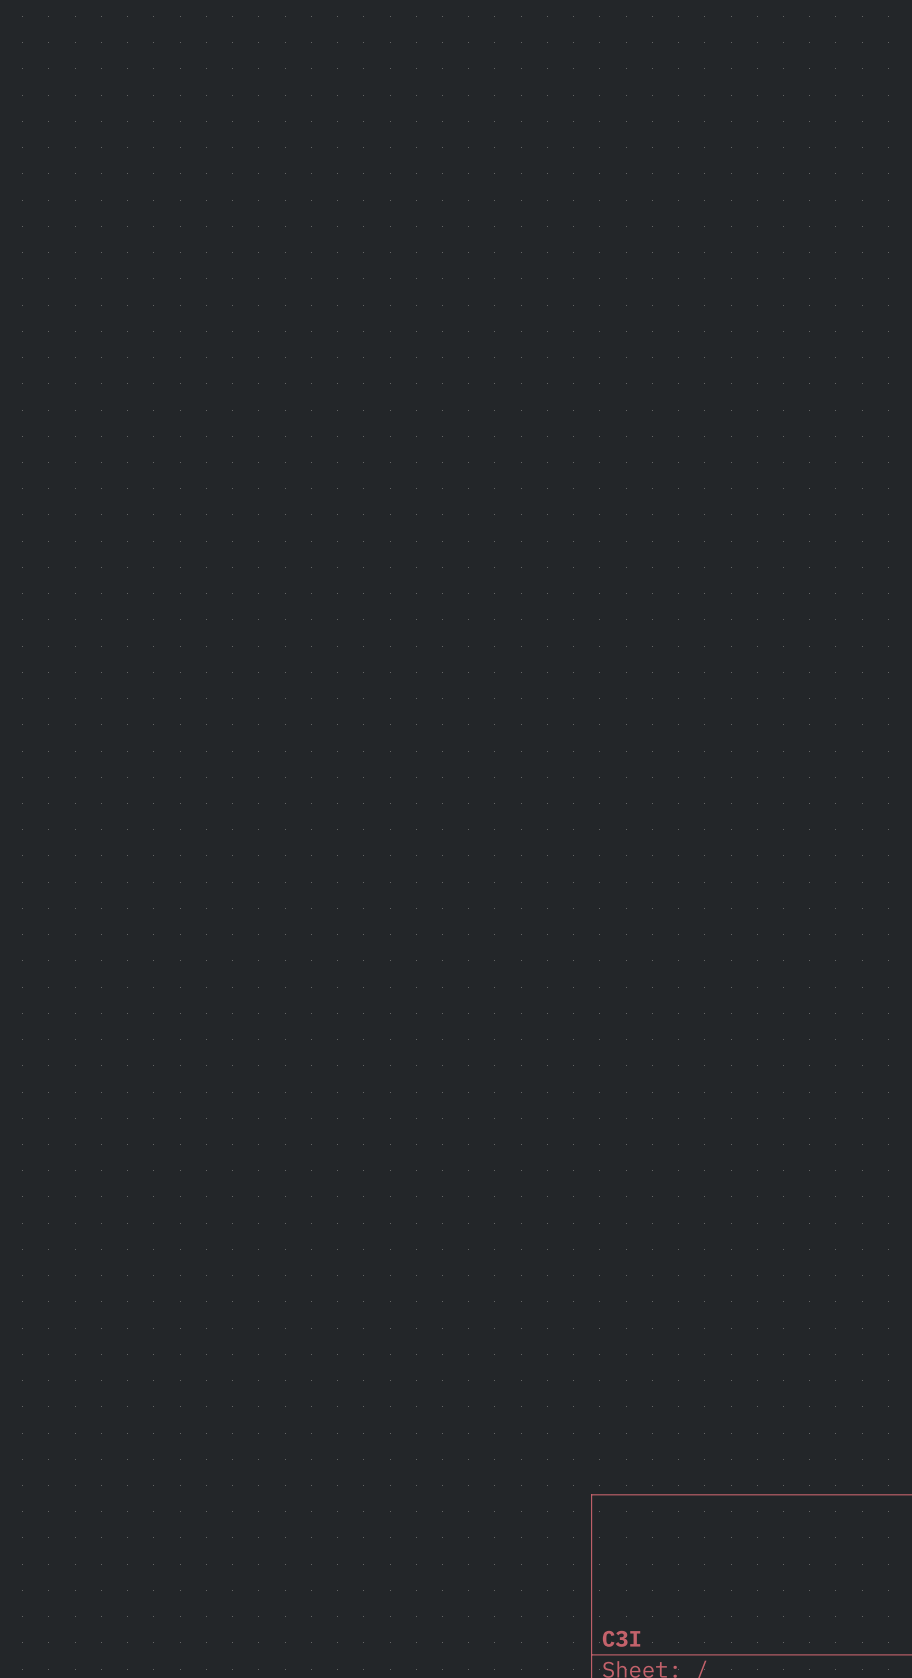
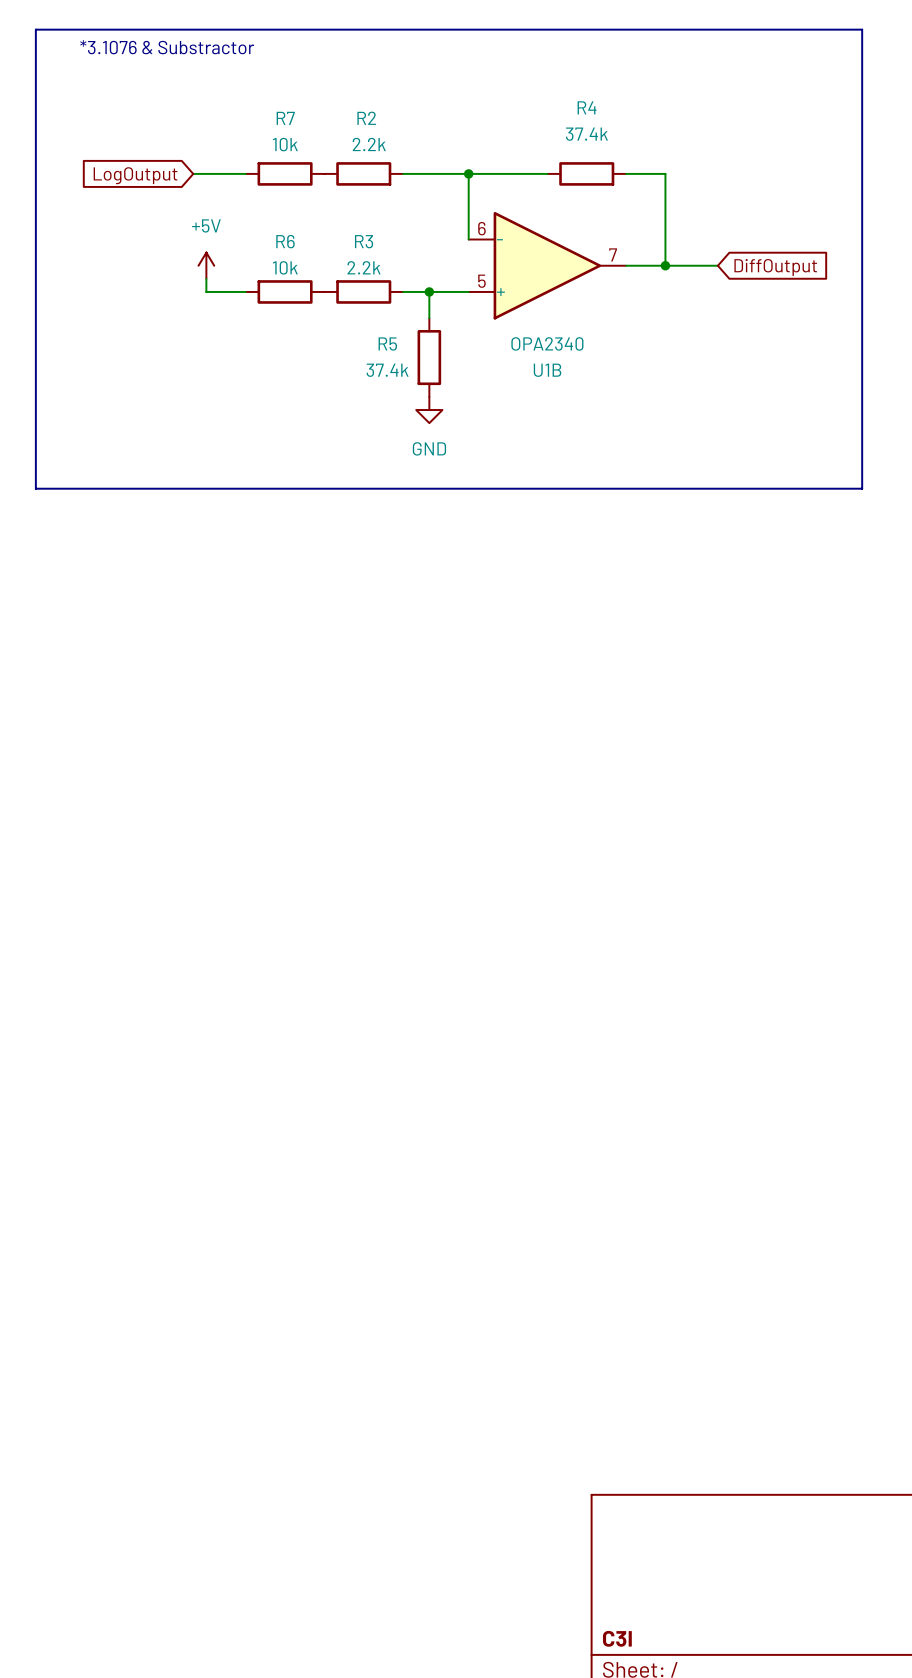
line: none -> (35, 29) (862, 29) (862, 488) (35, 488) (35, 29)
text: none -> *3.1076 & Substractor (167, 47)
wire: none -> (193, 173) (245, 173)
R7: none -> 10k (285, 173)
R2: none -> 2.2k (363, 173)
wire: none -> (403, 173) (547, 173)
wire: none -> (468, 173) (468, 239)
junction: none -> (468, 173)
R4: none -> 37.4k (586, 173)
wire: none -> (626, 173) (665, 173) (665, 265)
global label: none -> LogOutput (135, 175)
power symbol: none -> +5V (206, 265)
U1B: none -> OPA2340 (547, 265)
wire: none -> (626, 265) (717, 265)
junction: none -> (665, 265)
global label: none -> DiffOutput (775, 267)
wire: none -> (206, 278) (206, 291) (245, 291)
R6: none -> 10k (285, 291)
R3: none -> 2.2k (363, 291)
wire: none -> (403, 291) (468, 291)
wire: none -> (429, 291) (429, 318)
junction: none -> (429, 291)
R5: none -> 37.4k (429, 357)
power symbol: none -> GND (429, 410)

